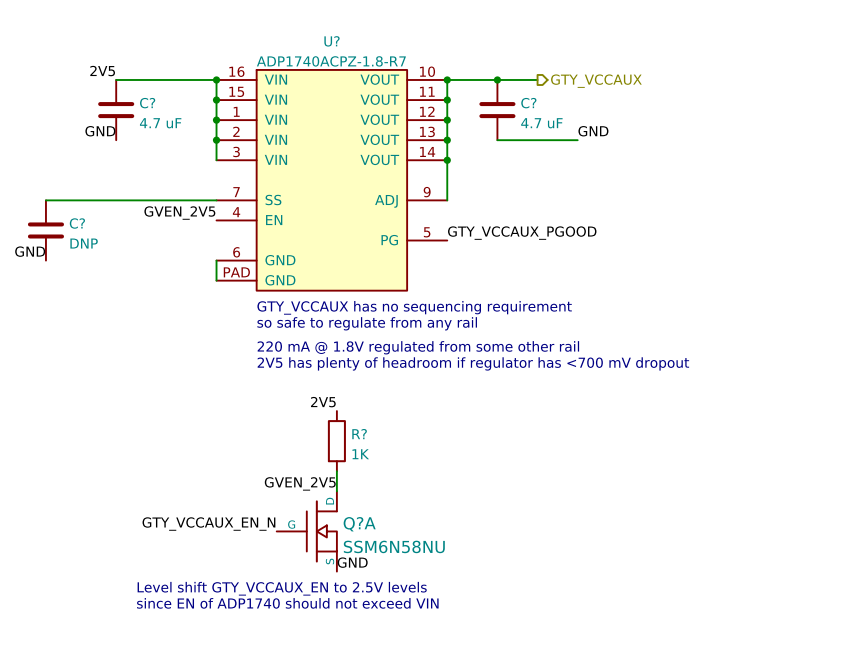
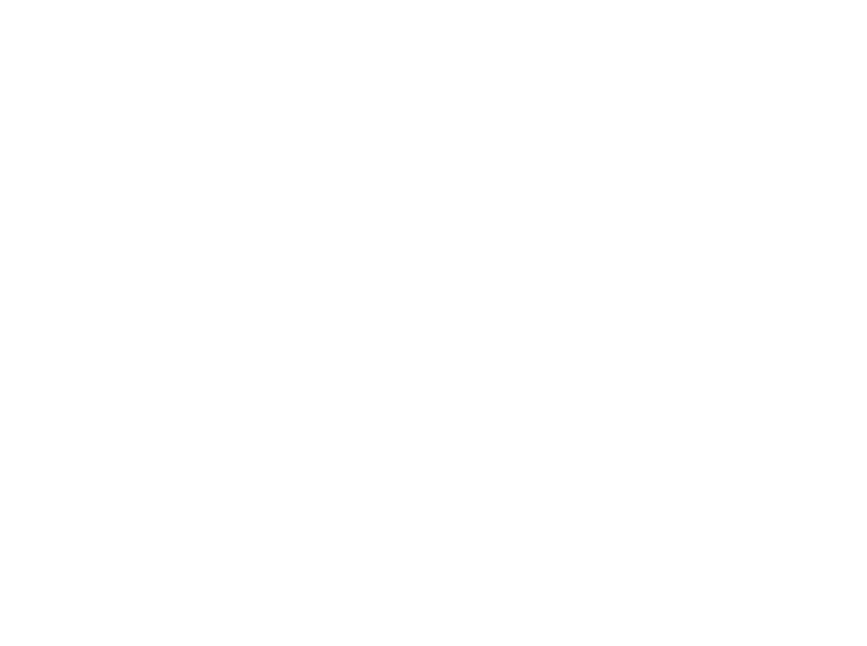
label: 2V5 (102, 71) -> none
wire: (116, 79) (216, 79) (216, 160) -> none
junction: (216, 79) -> none
junction: (447, 79) -> none
junction: (497, 79) -> none
wire: (537, 79) (447, 79) (447, 200) -> none
hierarchical label: GTY_VCCAUX (596, 81) -> none
junction: (216, 100) -> none
junction: (447, 100) -> none
C?: 4.7 uF (116, 110) -> none
C?: 4.7 uF (497, 110) -> none
junction: (216, 120) -> none
junction: (447, 120) -> none
label: GND (100, 131) -> none
label: GND (593, 131) -> none
junction: (216, 140) -> none
junction: (447, 140) -> none
wire: (497, 140) (577, 140) -> none
junction: (447, 160) -> none
U?: ADP1740ACPZ-1.8-R7 (331, 180) -> none
wire: (45, 200) (216, 200) -> none
label: GVEN_2V5 (179, 213) -> none
C?: DNP (45, 230) -> none
label: GTY_VCCAUX_PGOOD (522, 233) -> none
label: GND (30, 251) -> none
wire: (216, 260) (216, 280) -> none
text: GTY_VCCAUX has no sequencing requirement (414, 307) -> none
text: so safe to regulate from any rail (367, 323) -> none
text: 220 mA @ 1.8V regulated from some other rail (418, 347) -> none
text: 2V5 has plenty of headroom if regulator has <700 mV dropout (473, 363) -> none
label: 2V5 (323, 402) -> none
R?: 1K (336, 441) -> none
wire: (336, 471) (336, 491) -> none
label: GVEN_2V5 (300, 483) -> none
label: GTY_VCCAUX_EN_N (208, 524) -> none
Q?A: SSM6N58NU (307, 531) -> none
label: GND (352, 562) -> none
text: Level shift GTY_VCCAUX_EN to 2.5V levels (282, 588) -> none
text: since EN of ADP1740 should not exceed VIN (287, 603) -> none

